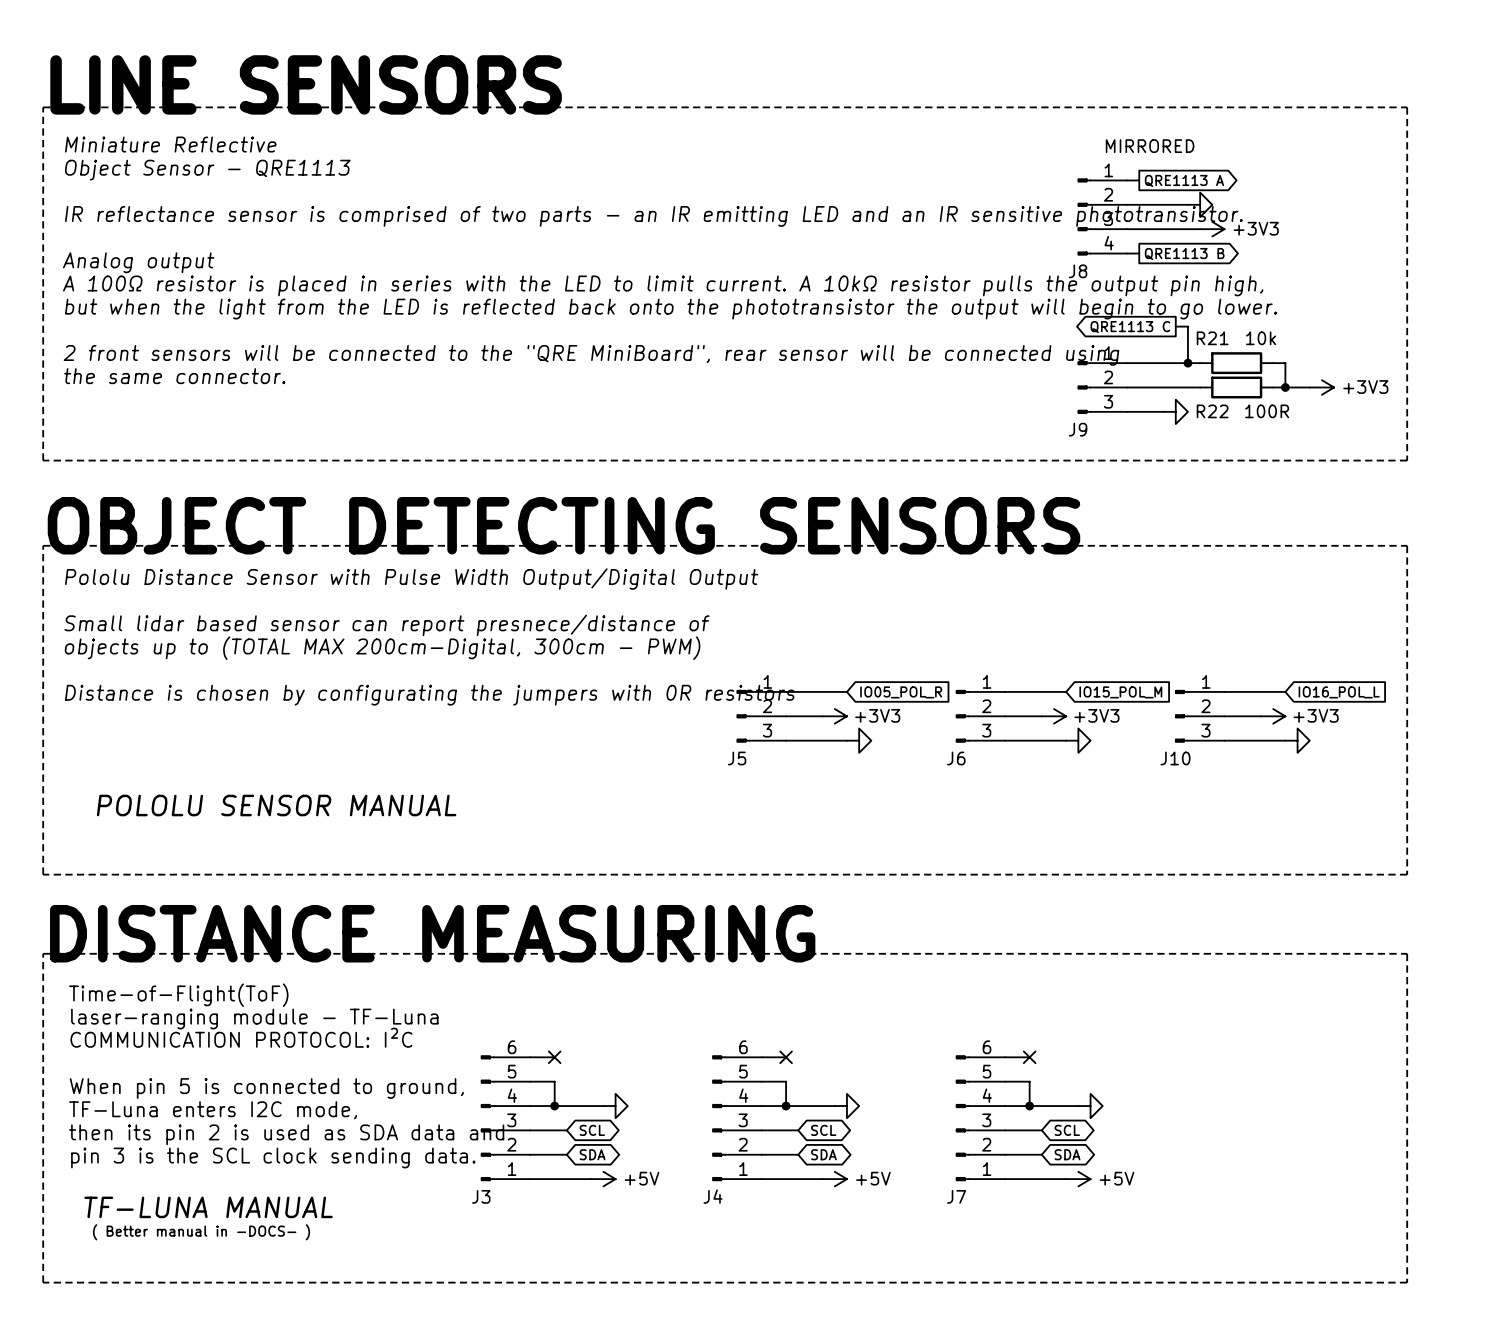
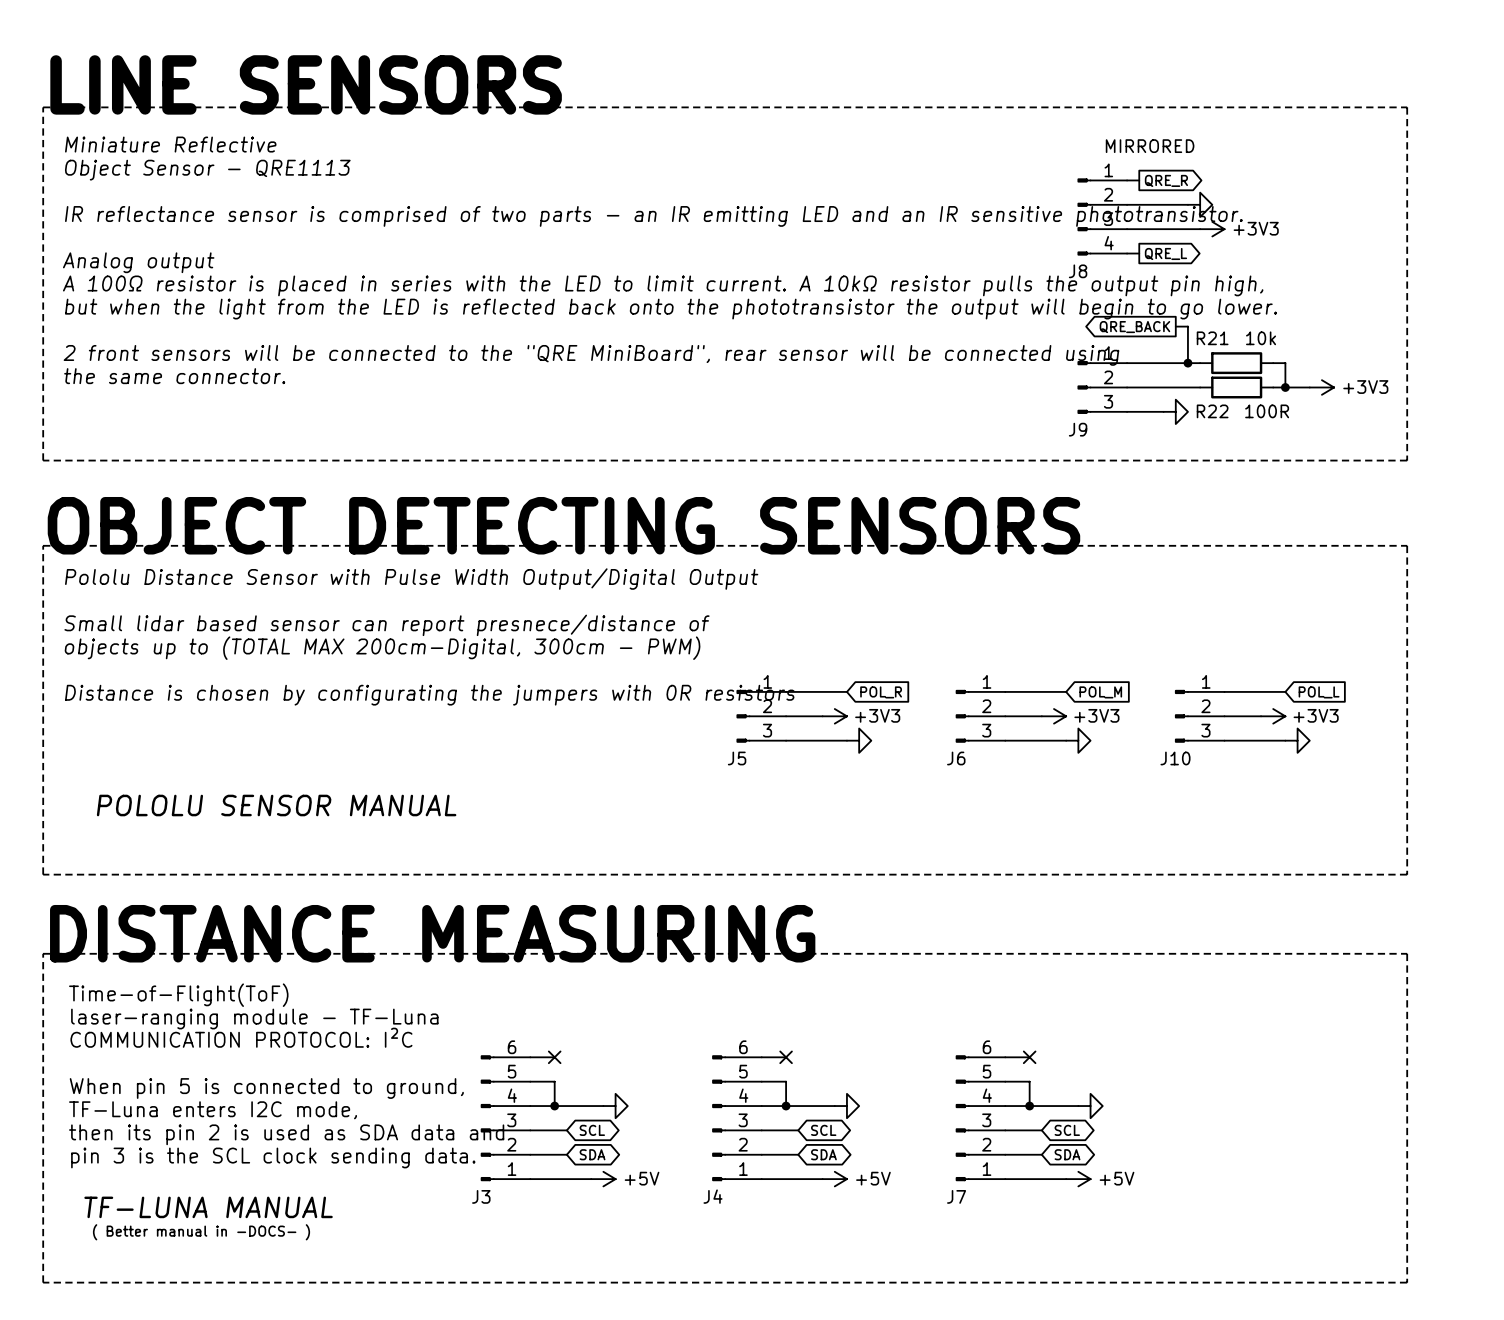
global label: QRE1113 A (1184, 180) -> QRE_R (1166, 180)
global label: QRE1113 B (1184, 253) -> QRE_L (1165, 253)
global label: QRE1113 C (1130, 327) -> QRE_BACK (1134, 327)
global label: IO05_POL_R (901, 692) -> POL_R (881, 692)
global label: IO15_POL_M (1120, 692) -> POL_M (1100, 692)
global label: IO16_POL_L (1339, 692) -> POL_L (1319, 692)

